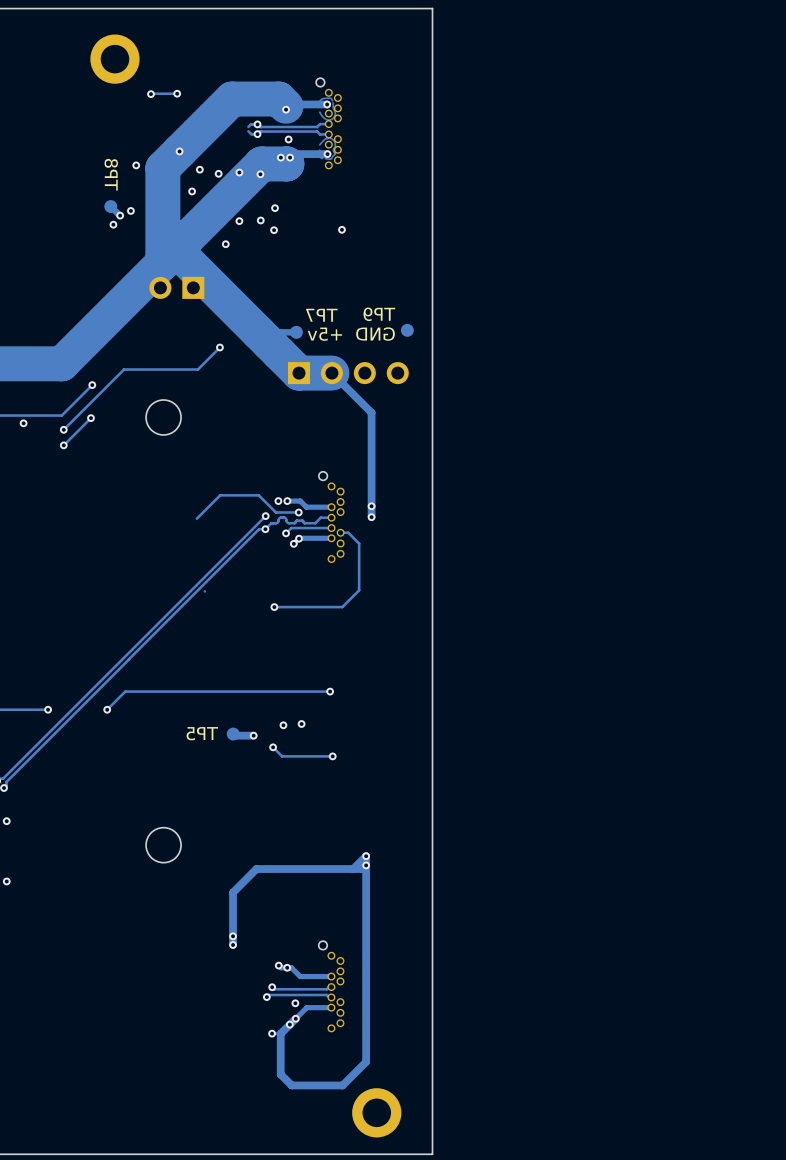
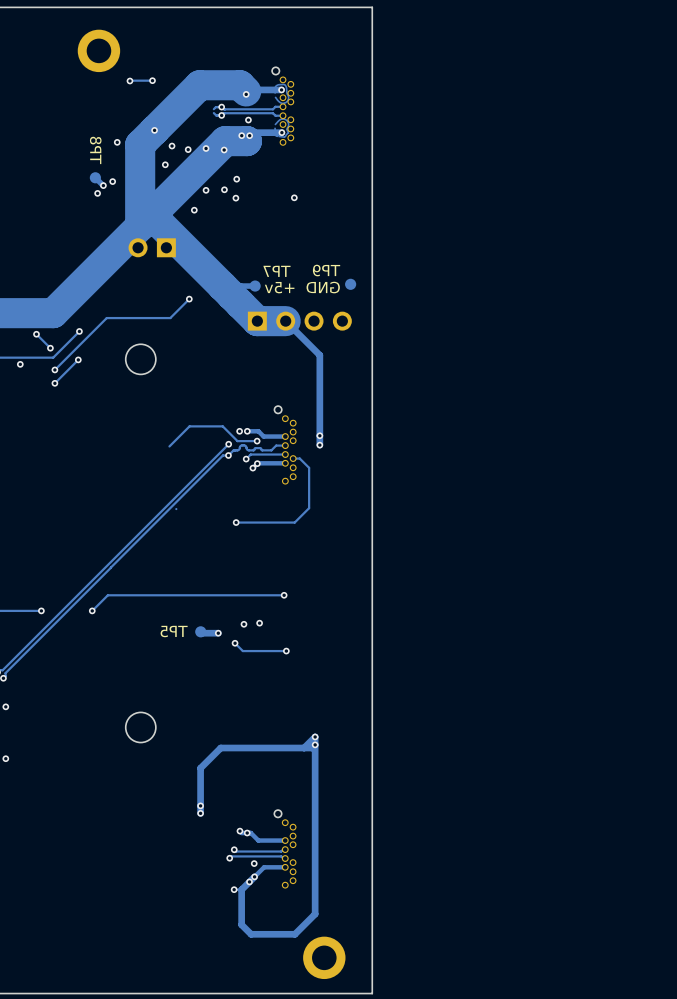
track: none -> (36, 334) (50, 348)
via: none -> (36, 334)
via: none -> (50, 348)

